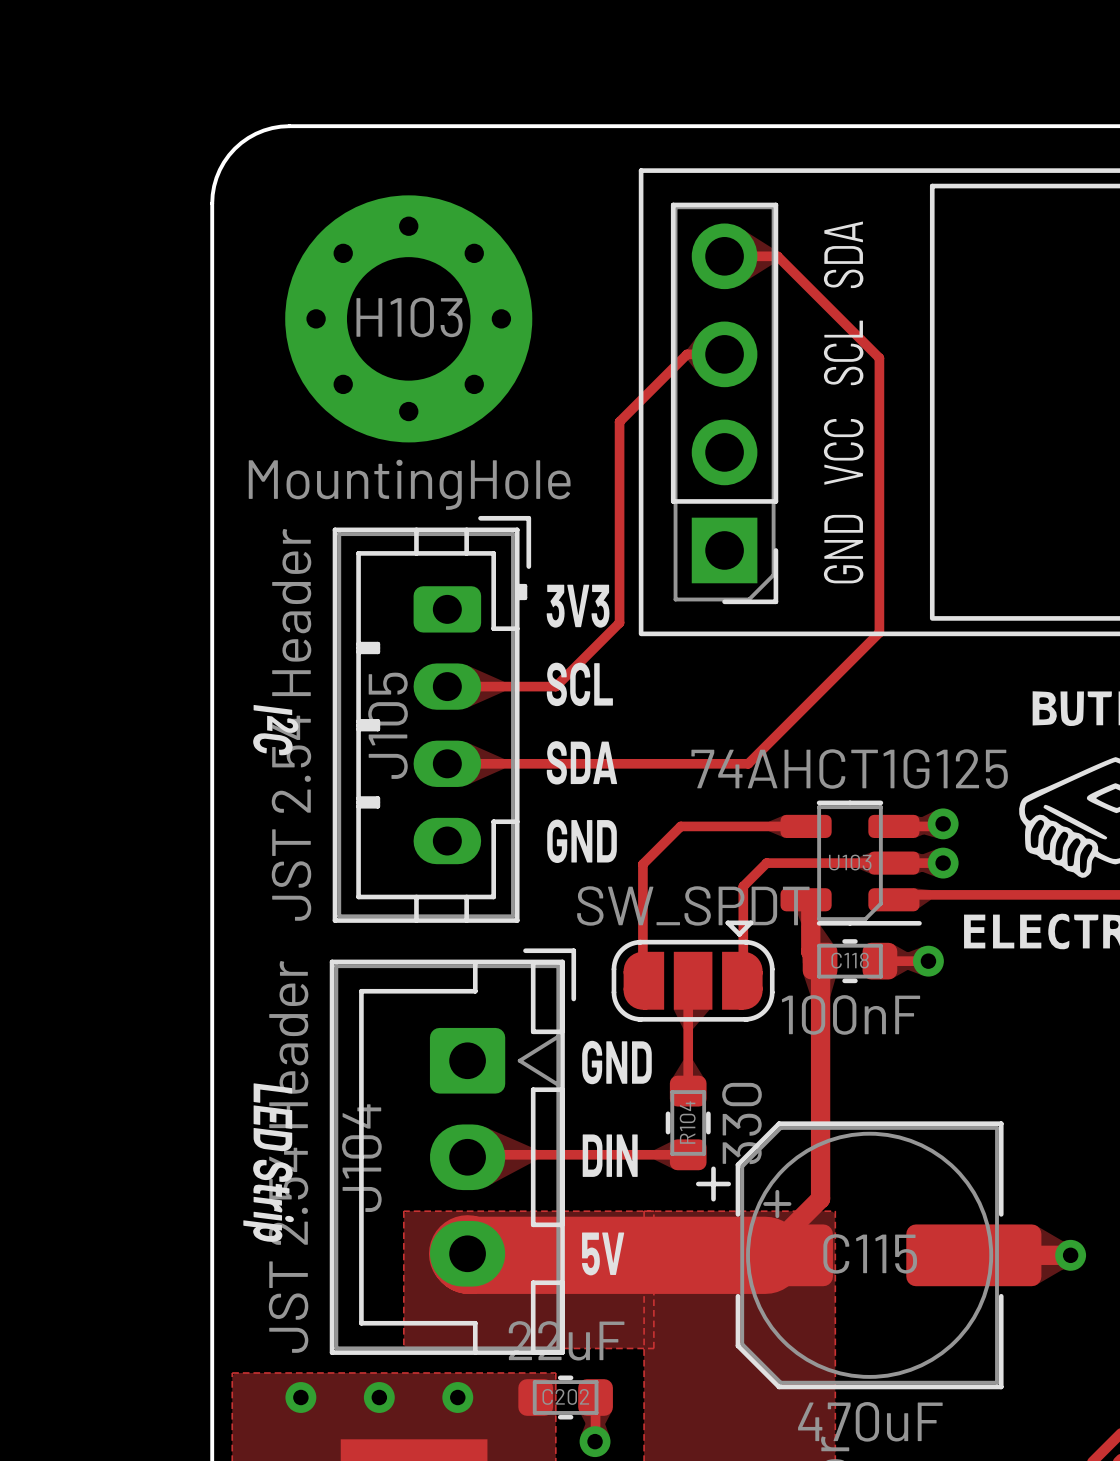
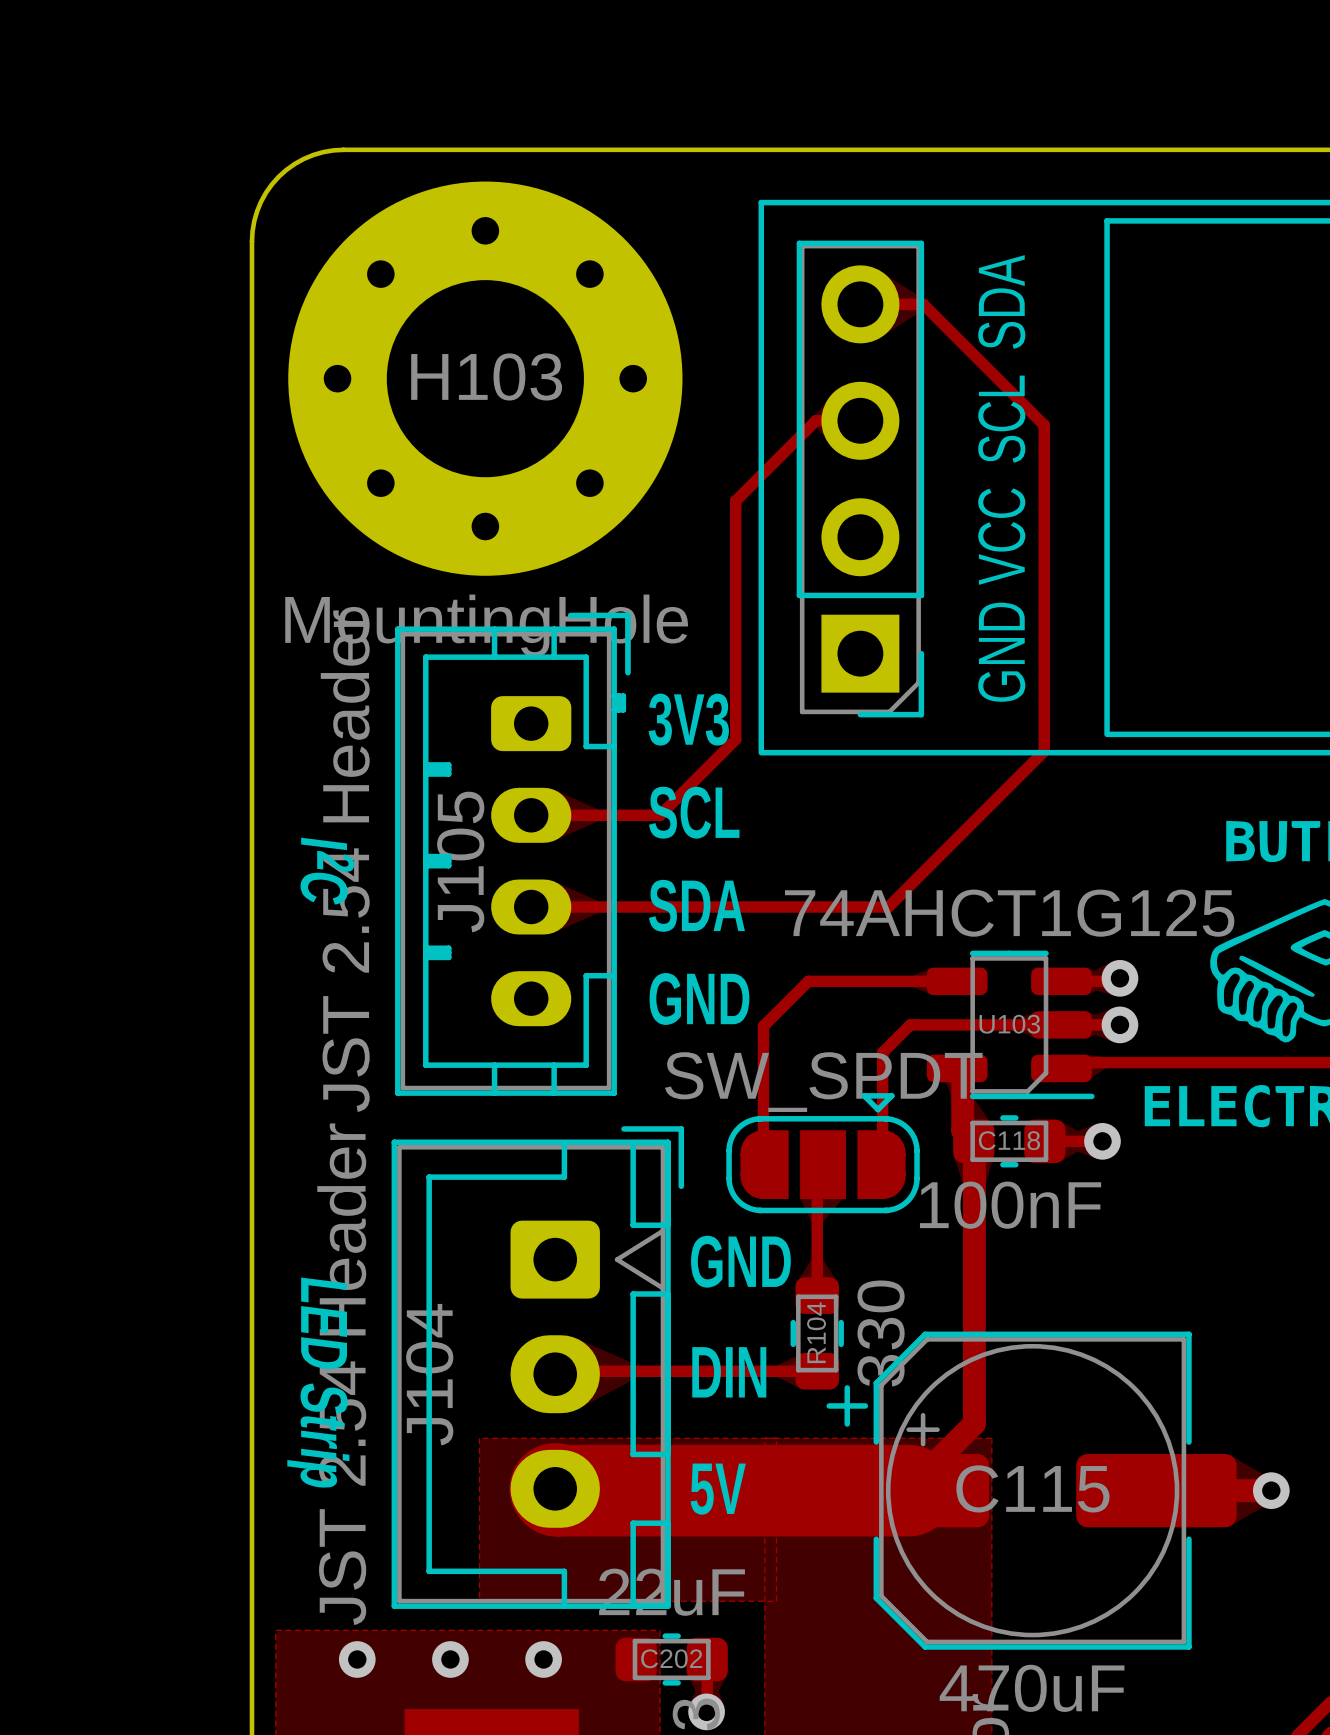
H103 footprint: [285, 195, 533, 443] -> [288, 181, 683, 576]

